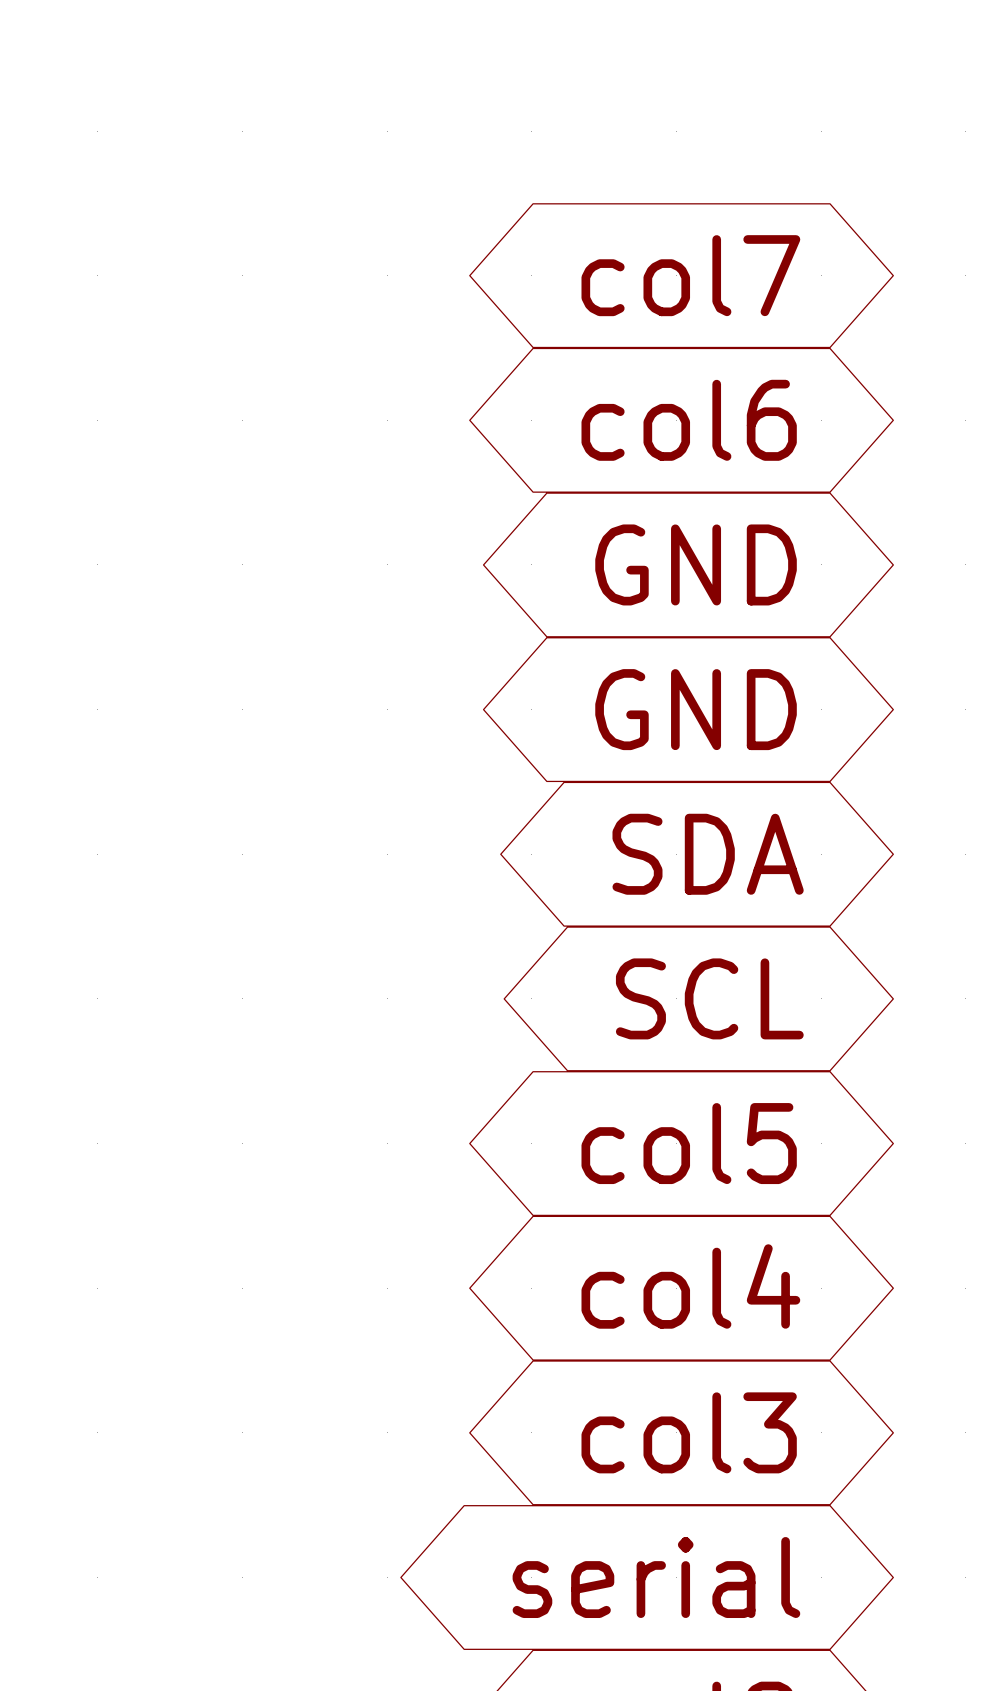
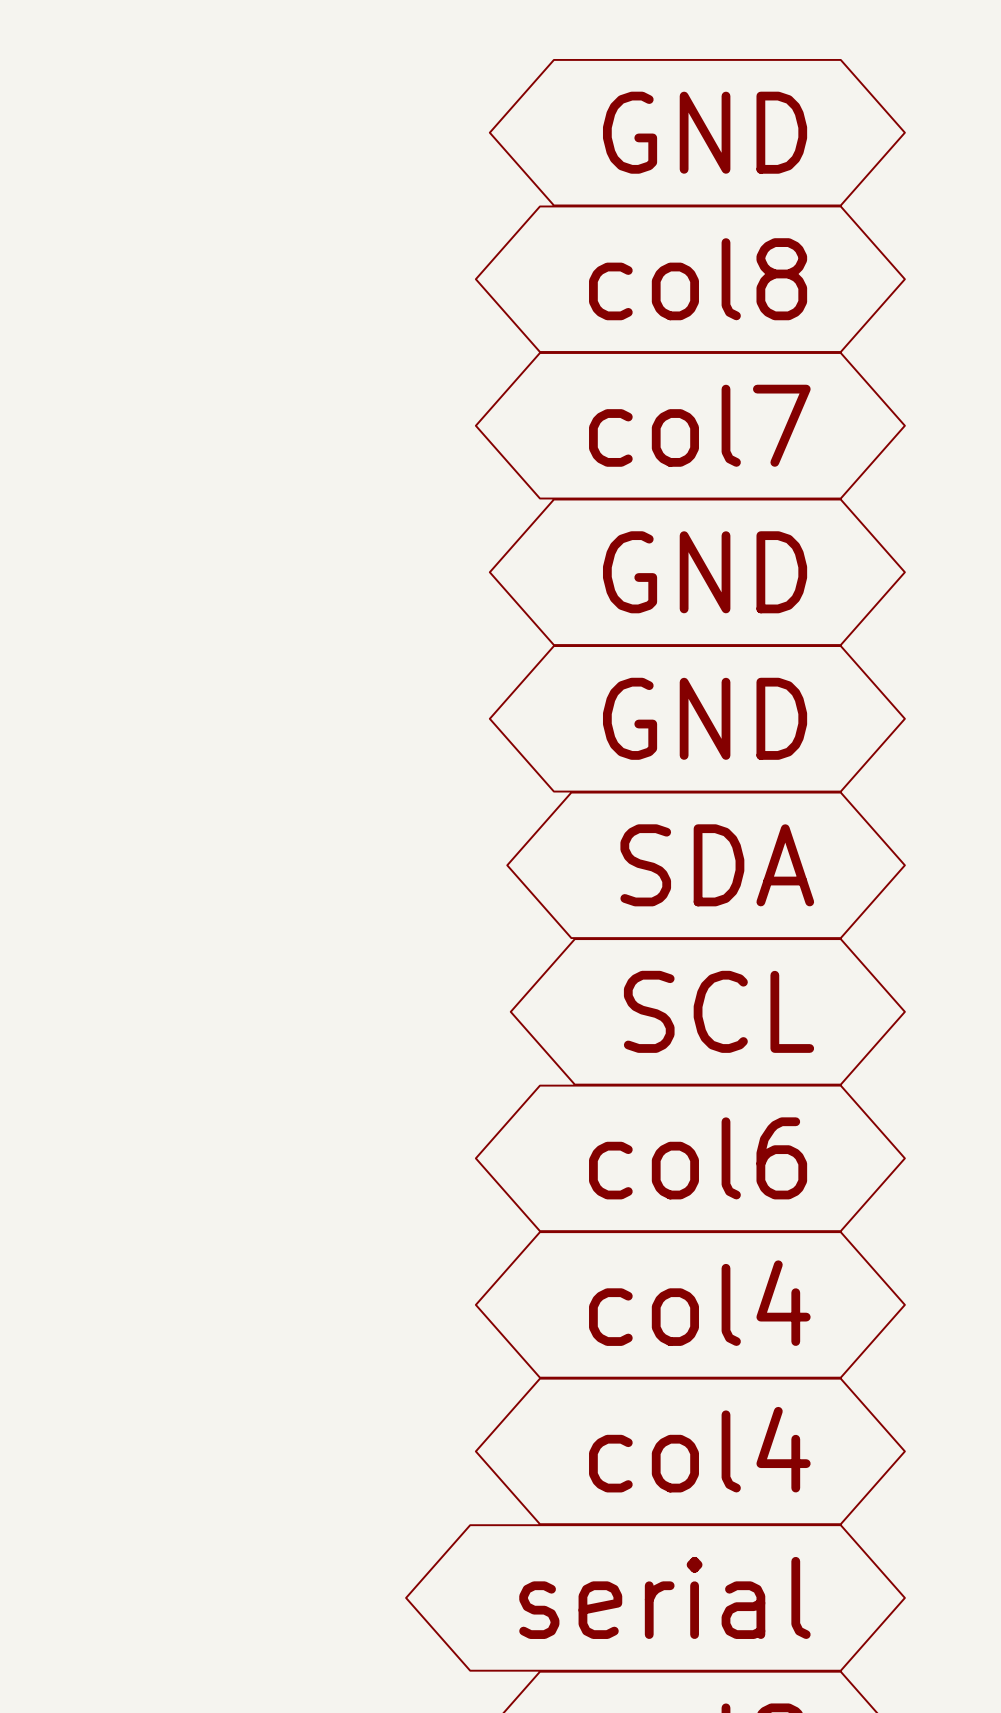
global label: none -> GND (705, 132)
global label: col7 (690, 275) -> col8 (698, 279)
global label: col6 (689, 420) -> col7 (699, 425)
global label: col5 (689, 1143) -> col6 (698, 1158)
global label: col3 (689, 1432) -> col4 (699, 1449)

